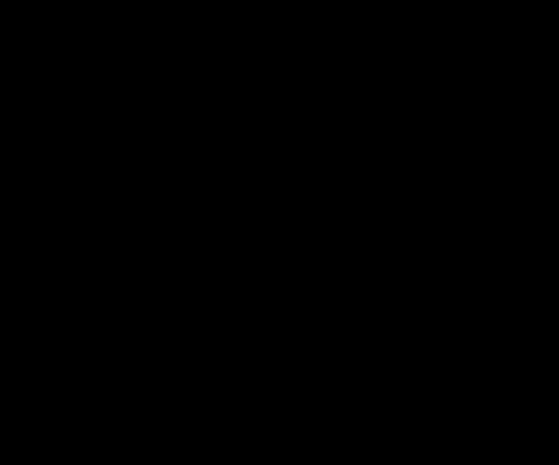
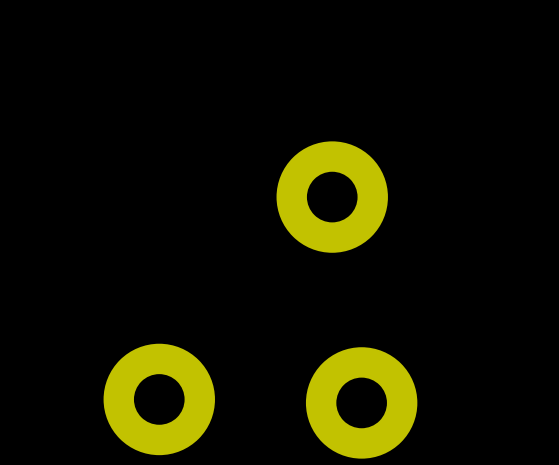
part: none -> (332, 197)
part: none -> (159, 399)
part: none -> (361, 402)

